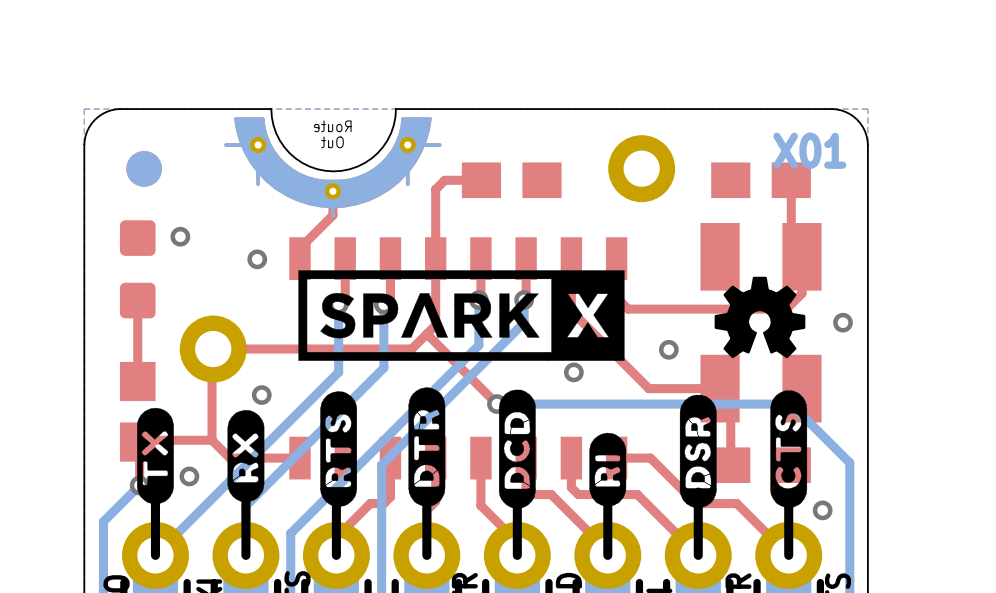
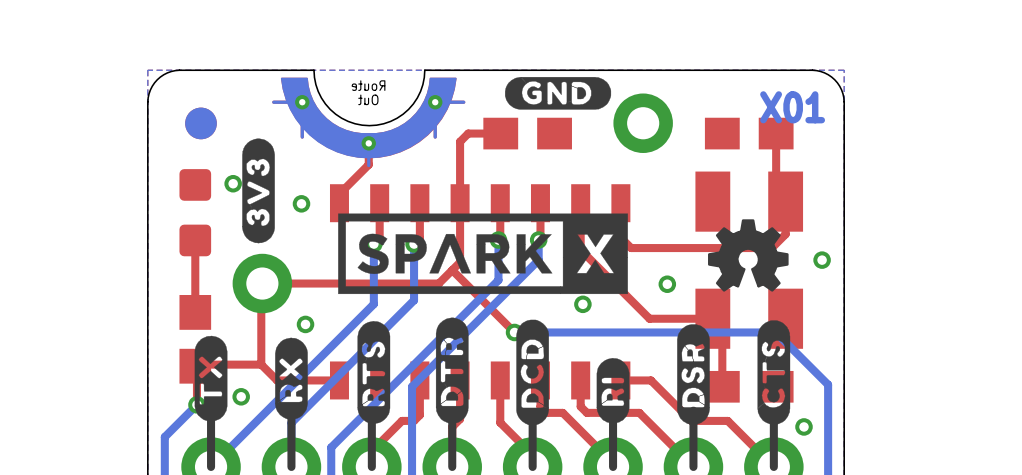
drawing: none -> [505, 77, 612, 110]
drawing: none -> [242, 138, 275, 244]

